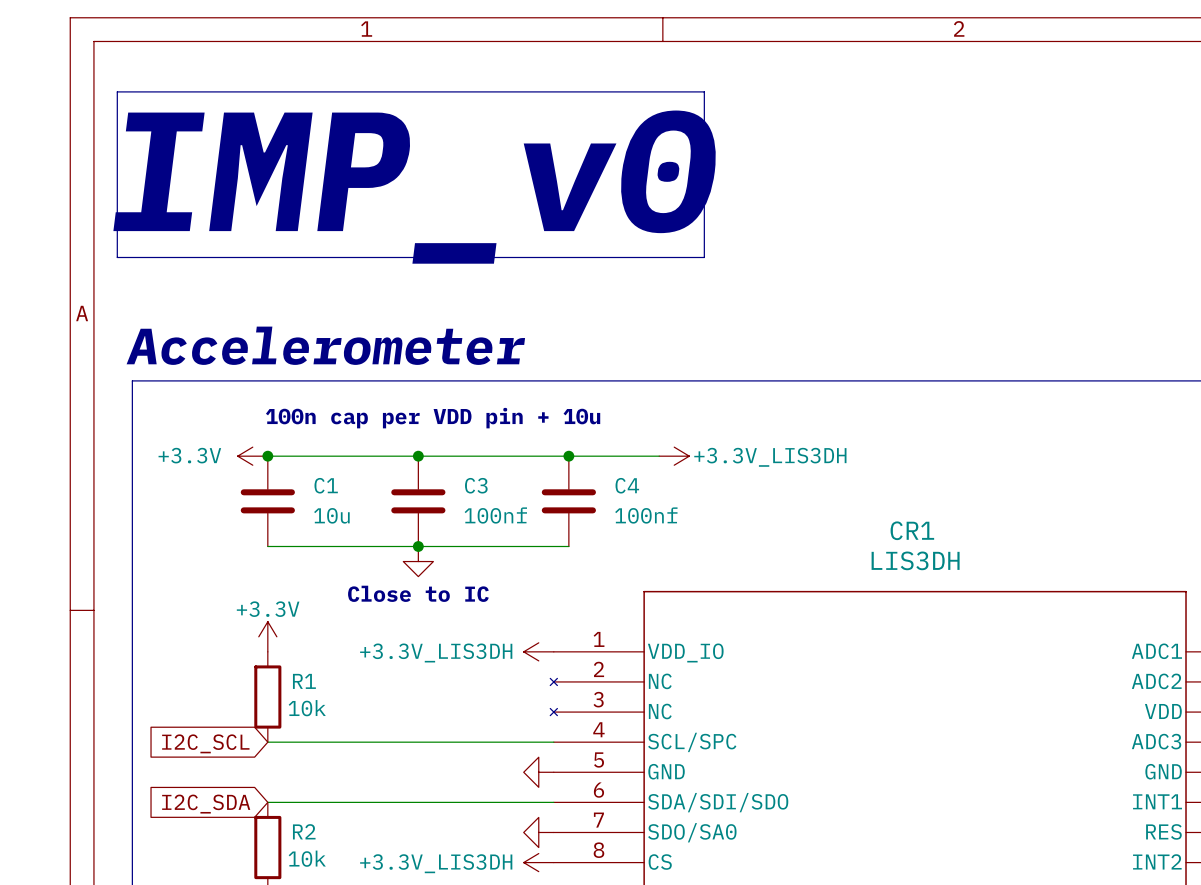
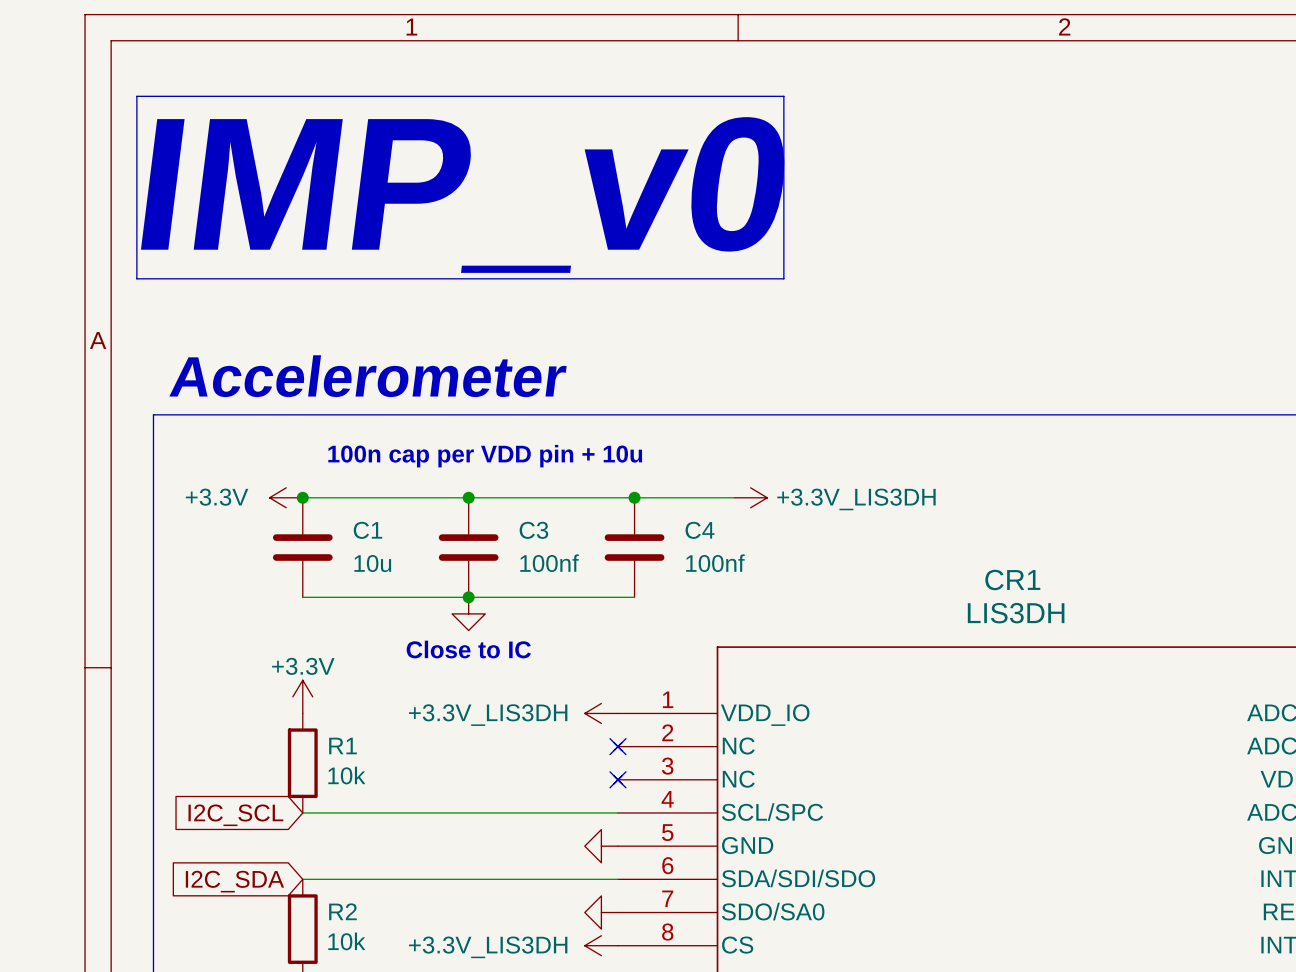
no-connect mark: none -> (617, 746)
no-connect mark: none -> (617, 779)

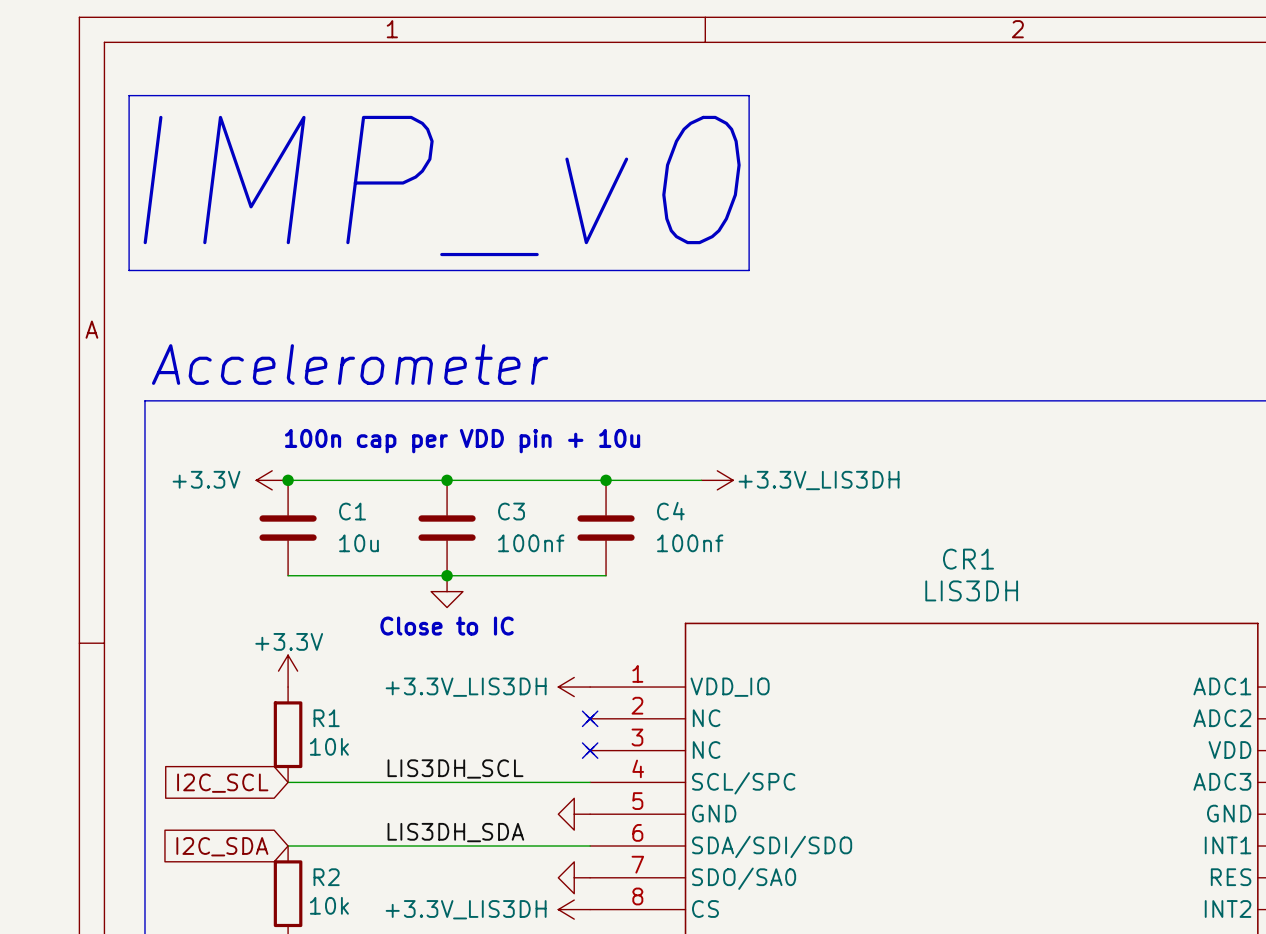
label: none -> LIS3DH_SCL (455, 768)
label: none -> LIS3DH_SDA (455, 832)

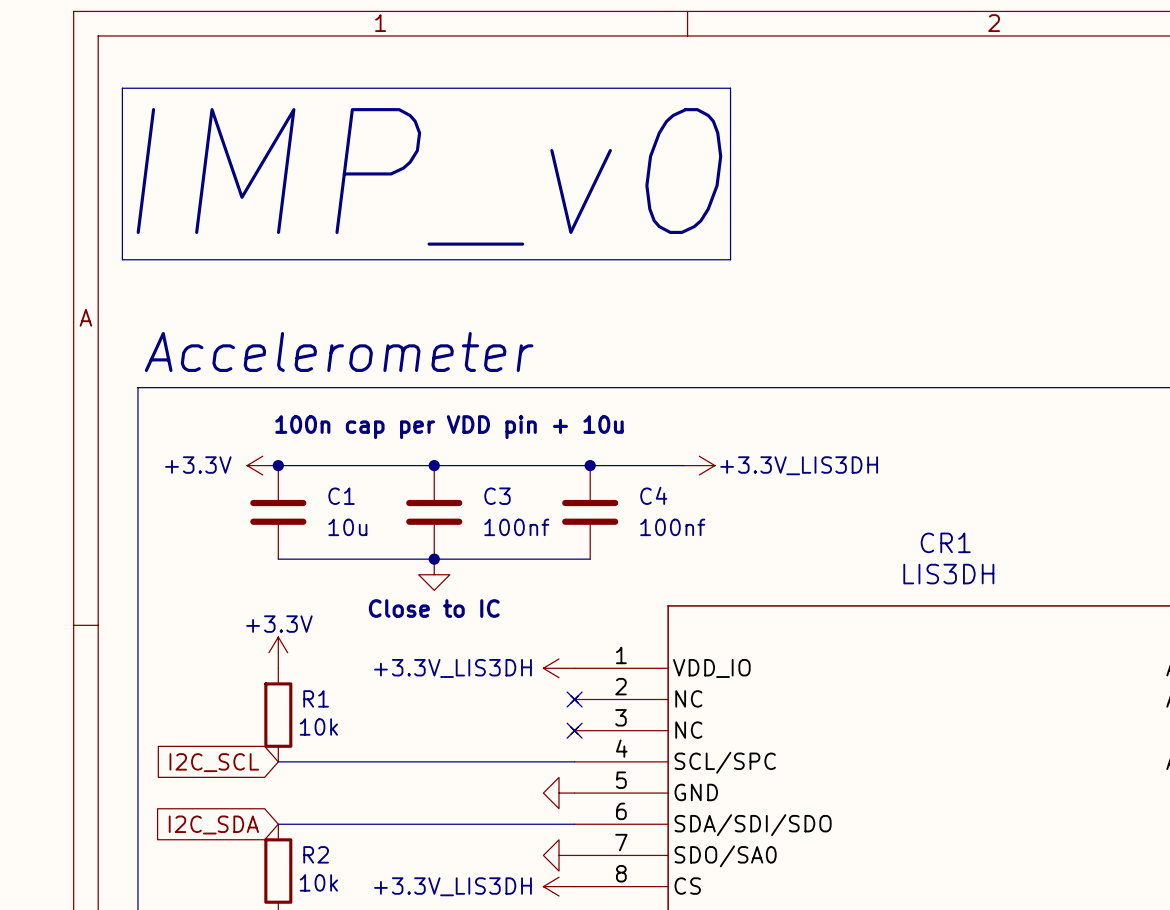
label: LIS3DH_SCL (455, 768) -> none
label: LIS3DH_SDA (455, 832) -> none

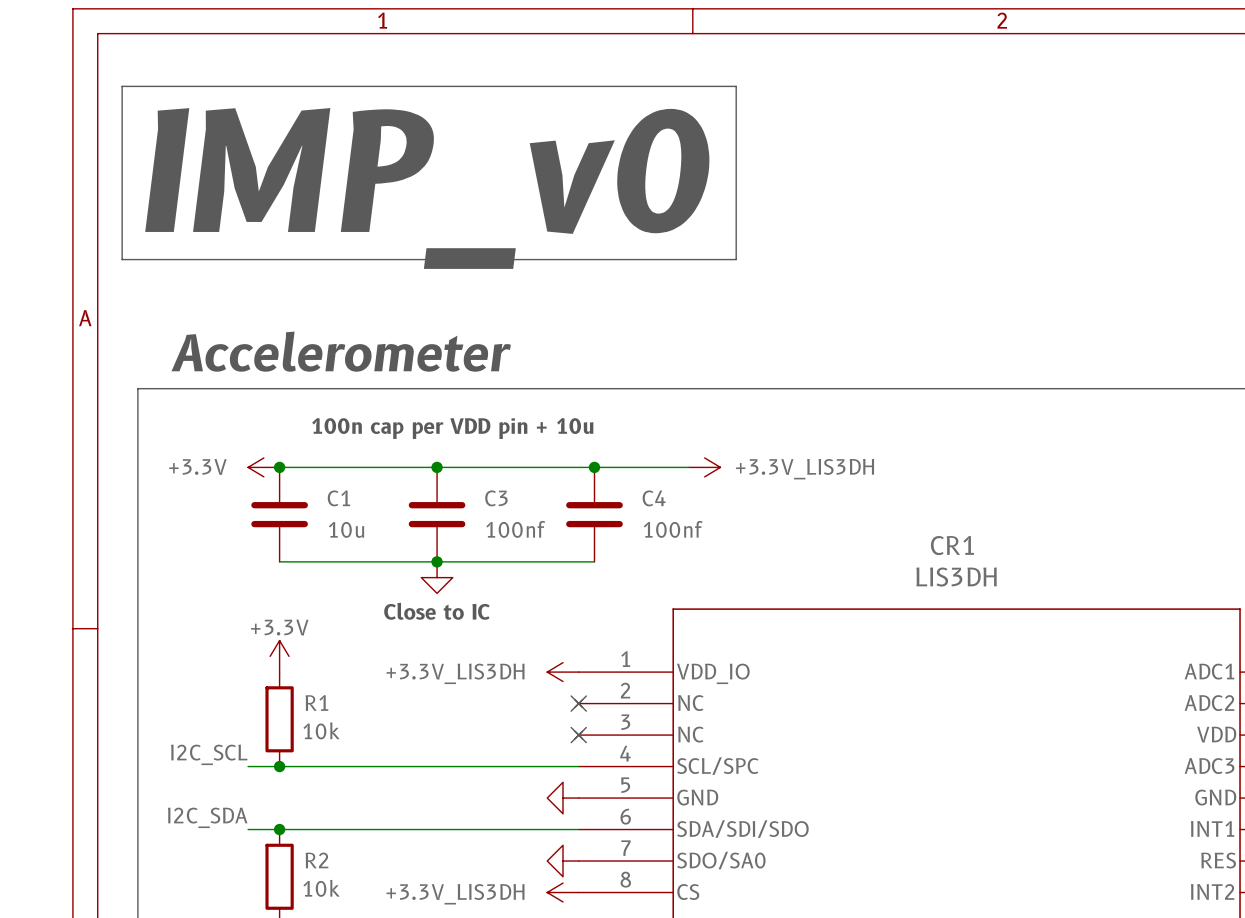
label: none -> I2C_SCL (209, 754)
wire: none -> (248, 766) (279, 766)
junction: none -> (279, 766)
global label: I2C_SCL (214, 762) -> none
label: none -> I2C_SDA (207, 817)
global label: I2C_SDA (213, 824) -> none
wire: none -> (248, 829) (279, 829)
junction: none -> (279, 829)

